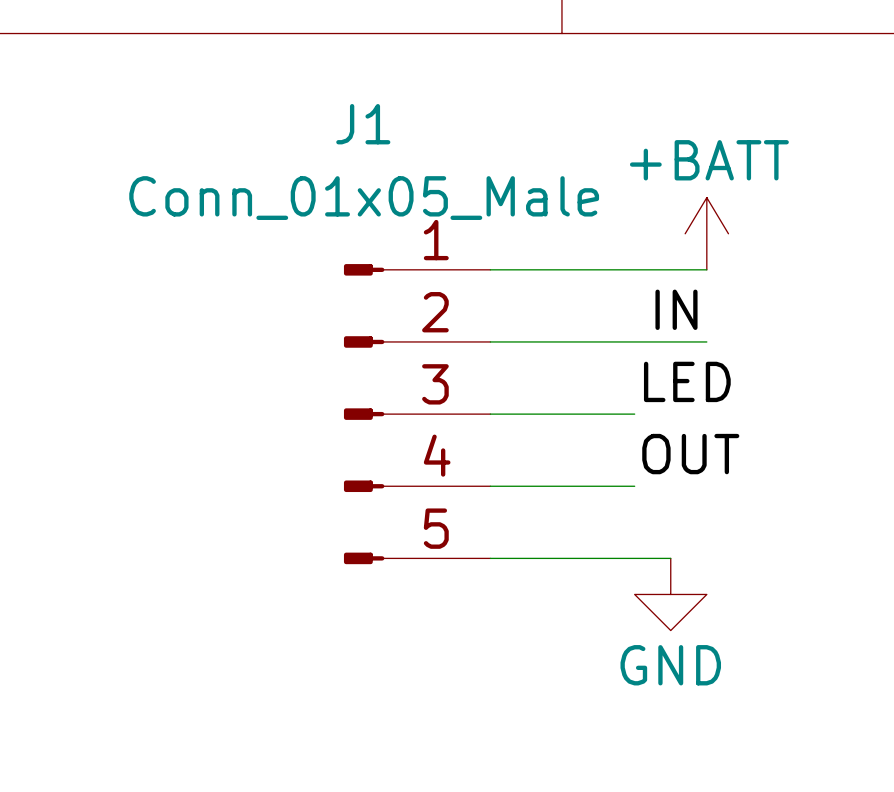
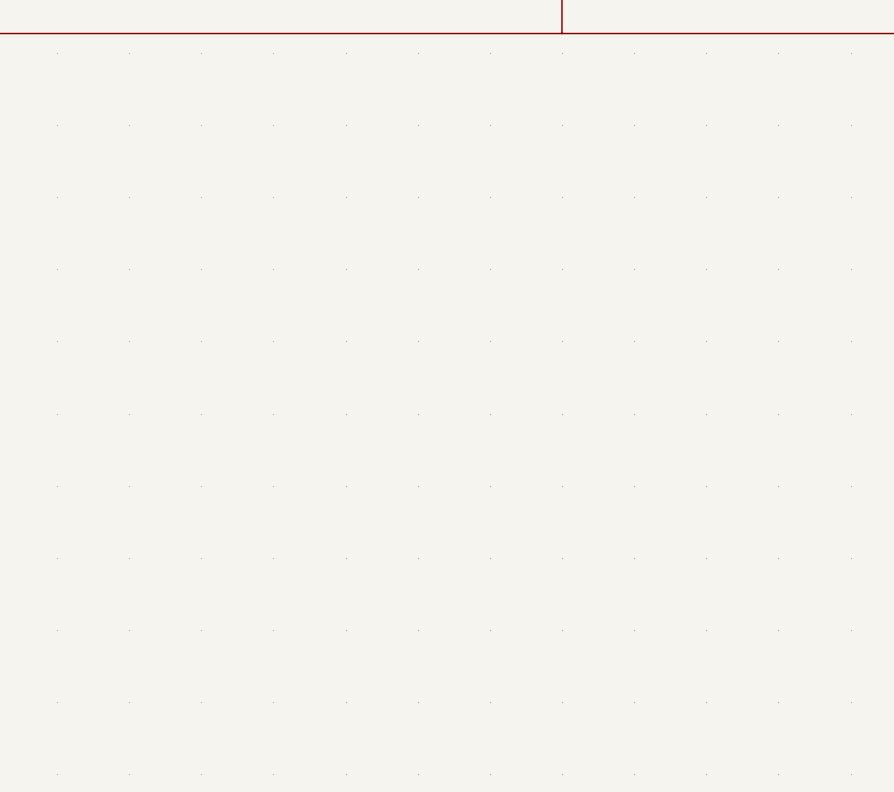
power symbol: +BATT (706, 233) -> none
wire: (490, 269) (706, 269) -> none
label: IN (676, 309) -> none
wire: (490, 341) (706, 341) -> none
label: LED (687, 381) -> none
J1: Conn_01x05_Male (417, 414) -> none
wire: (490, 414) (634, 414) -> none
label: OUT (690, 454) -> none
wire: (490, 486) (634, 486) -> none
wire: (490, 558) (670, 558) -> none
power symbol: GND (670, 594) -> none

